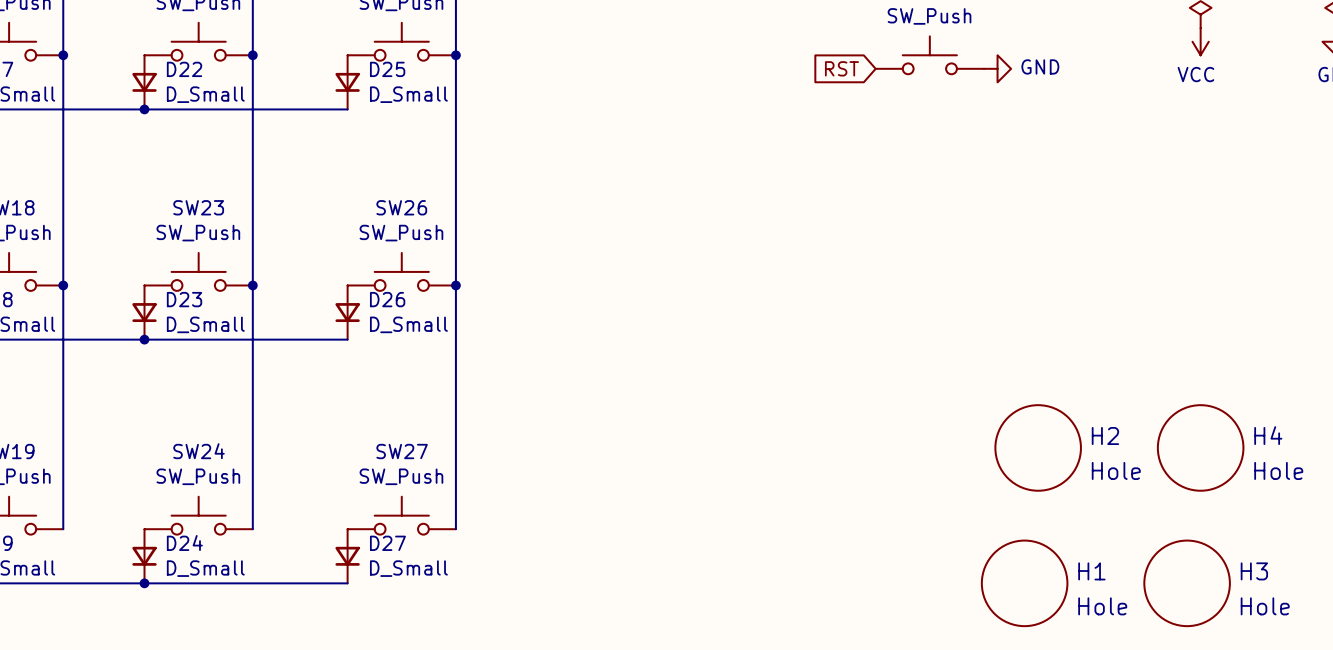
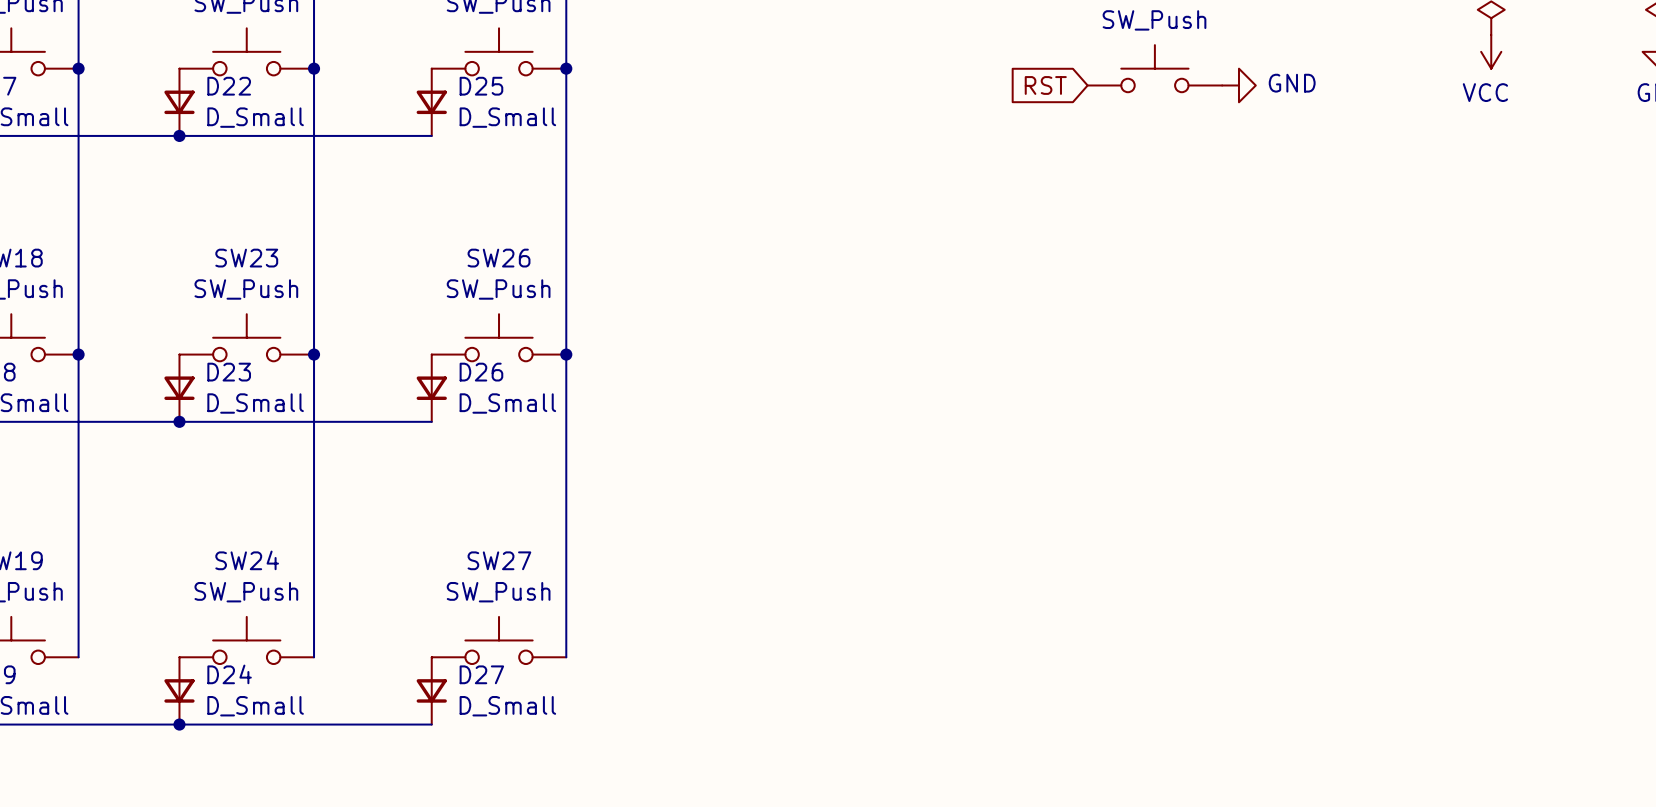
H2: Hole (1038, 447) -> none
H4: Hole (1200, 447) -> none
H1: Hole (1024, 583) -> none
H3: Hole (1187, 583) -> none

